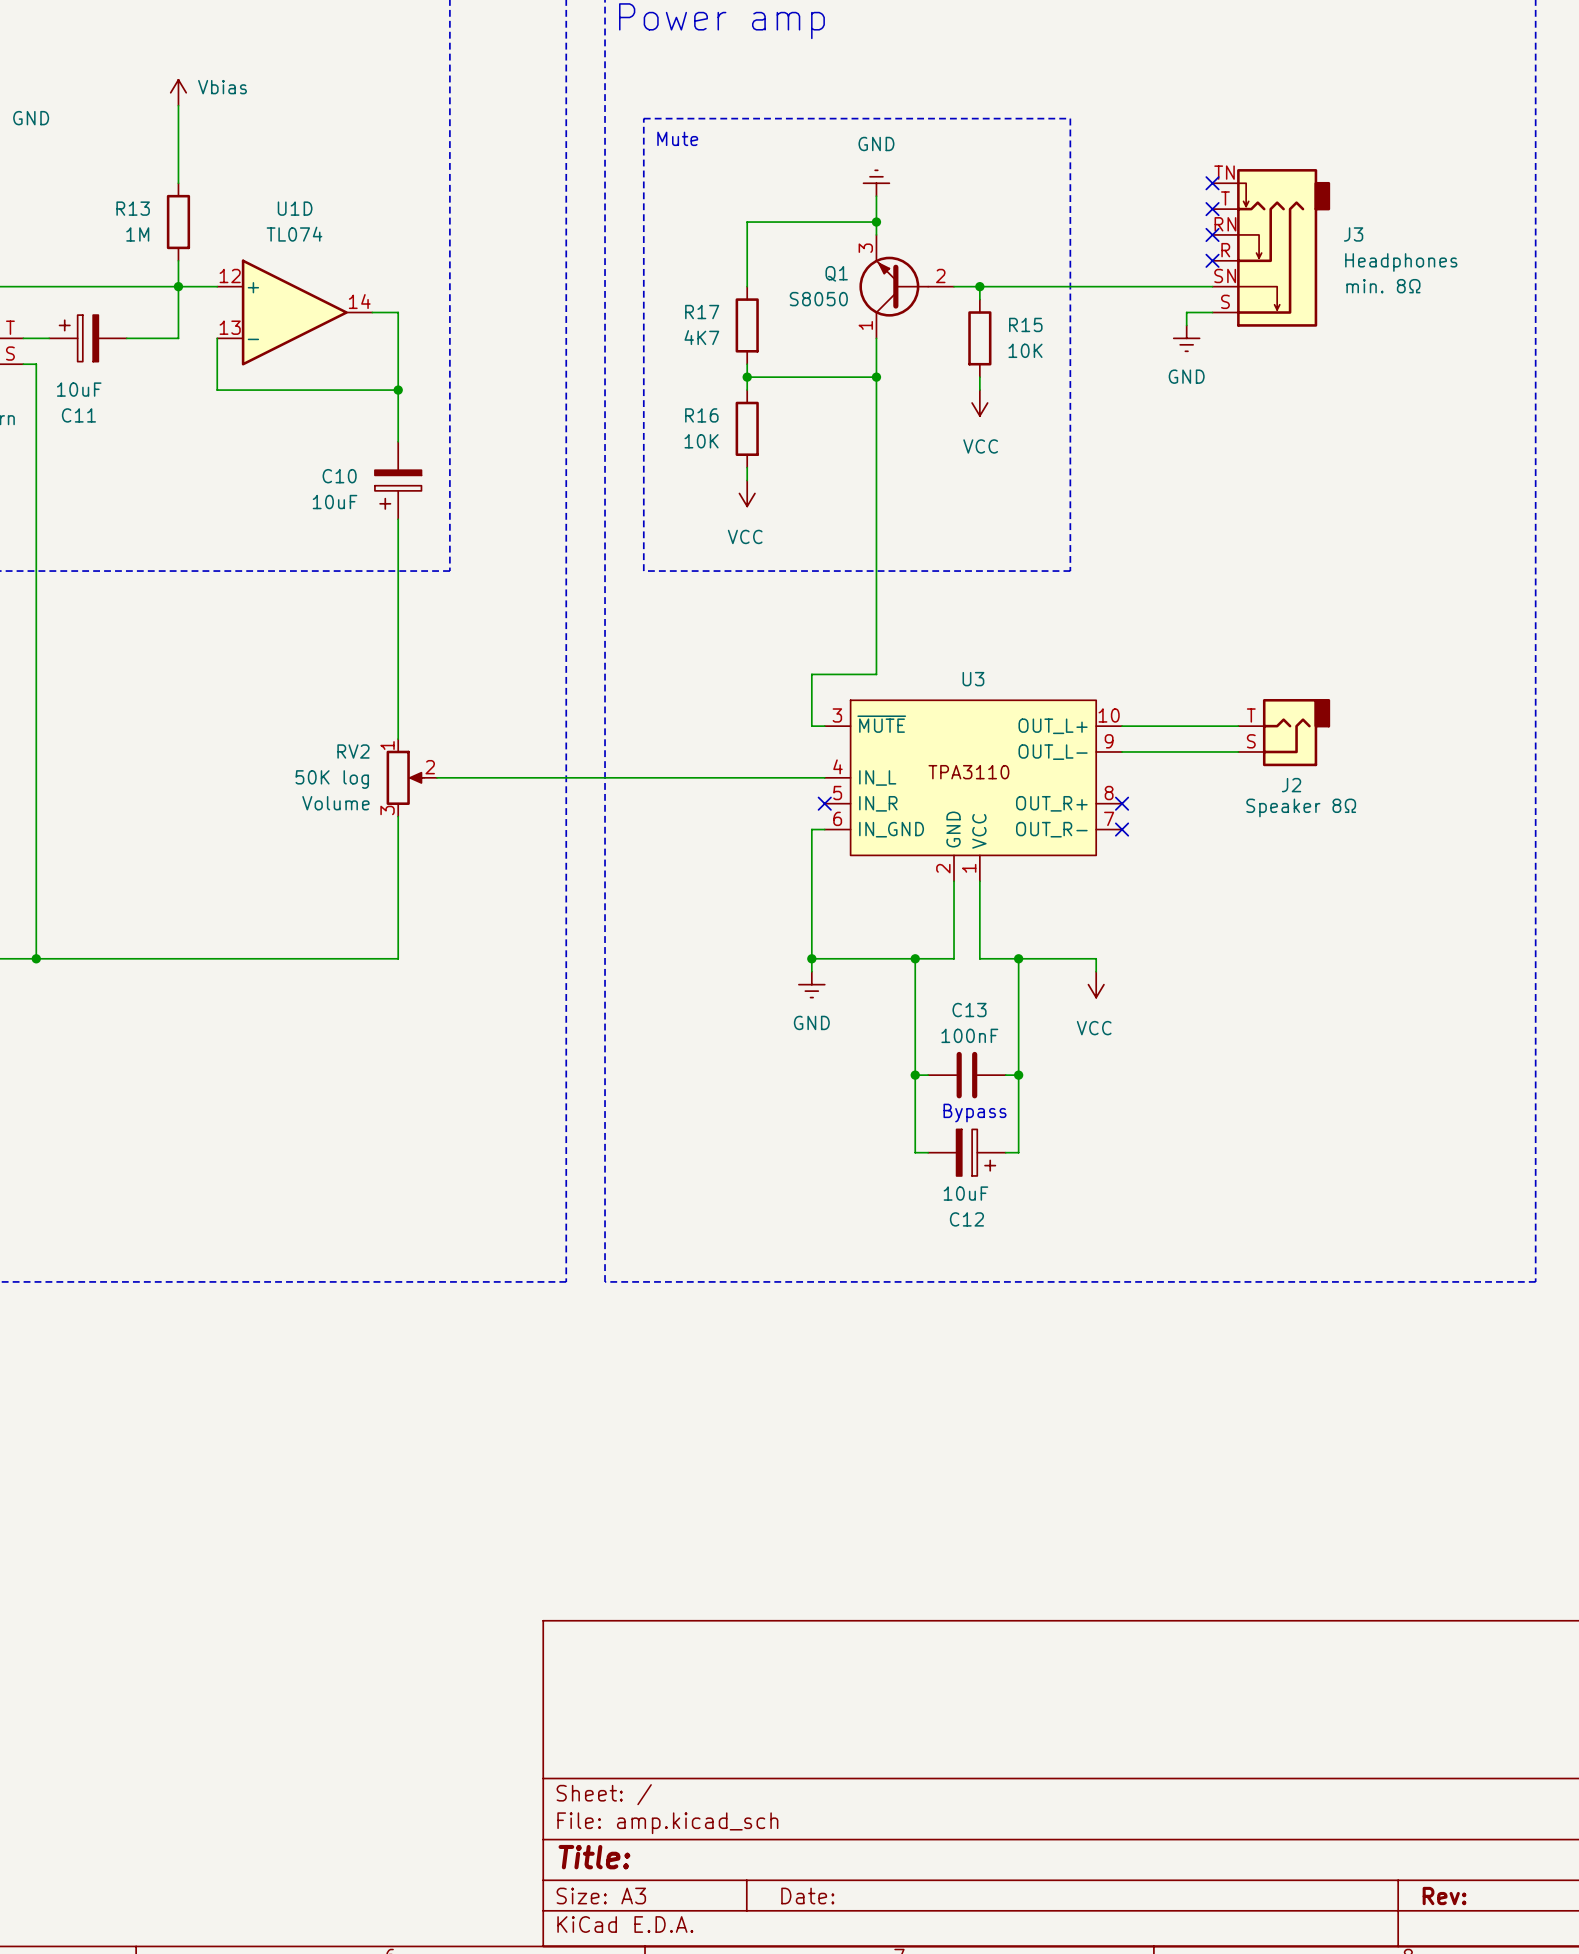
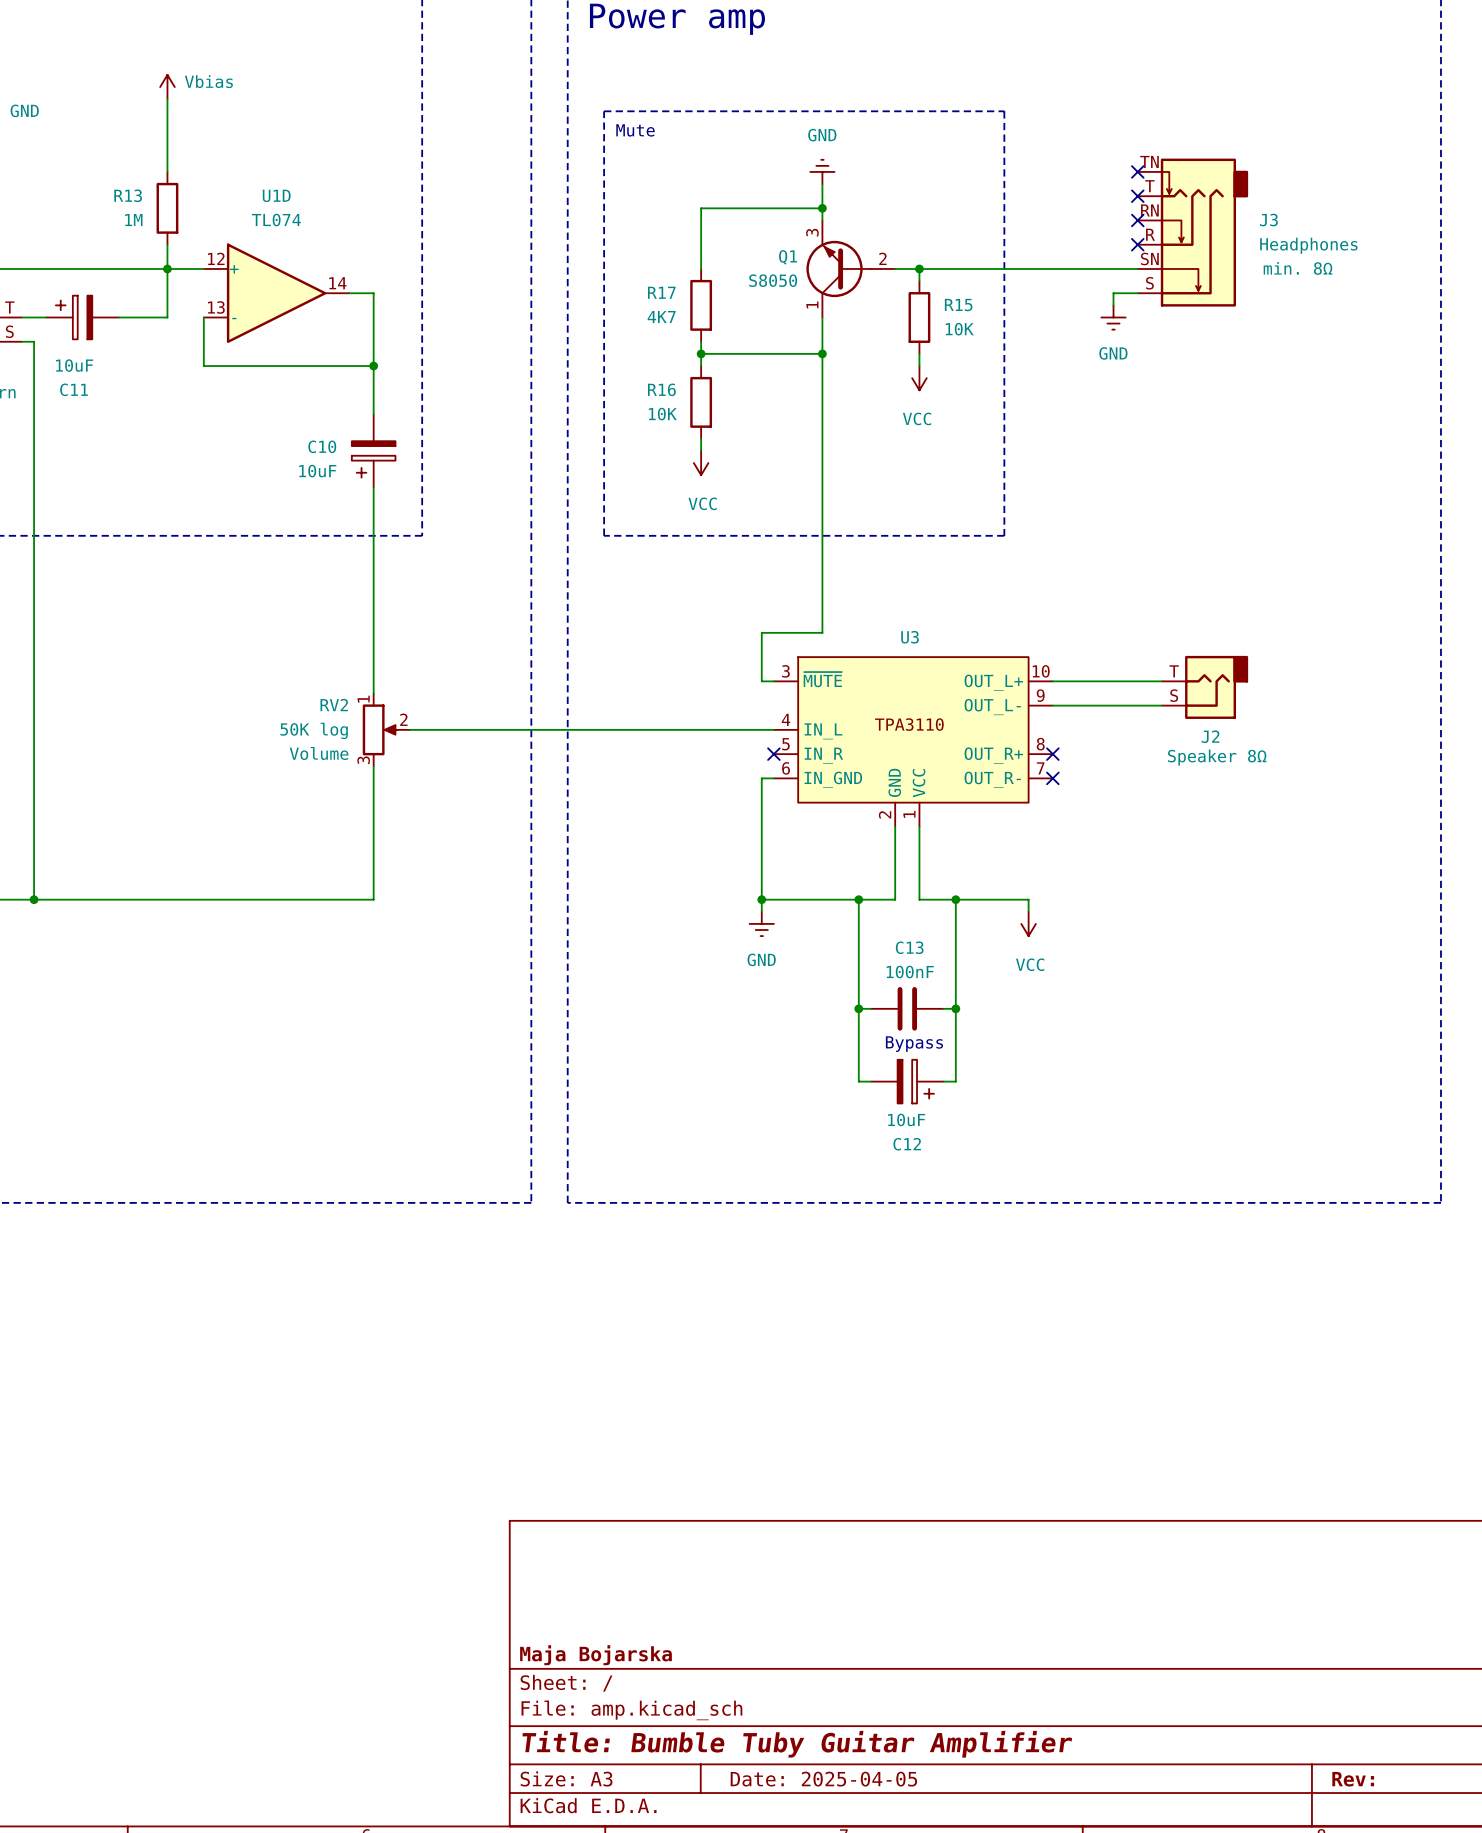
title block: none -> Maja Bojarska (596, 1655)
title block: Title: (594, 1857) -> Title: Bumble Tuby Guitar Amplifier (797, 1744)
title block: Date: (807, 1896) -> Date: 2025-04-05 (823, 1779)

